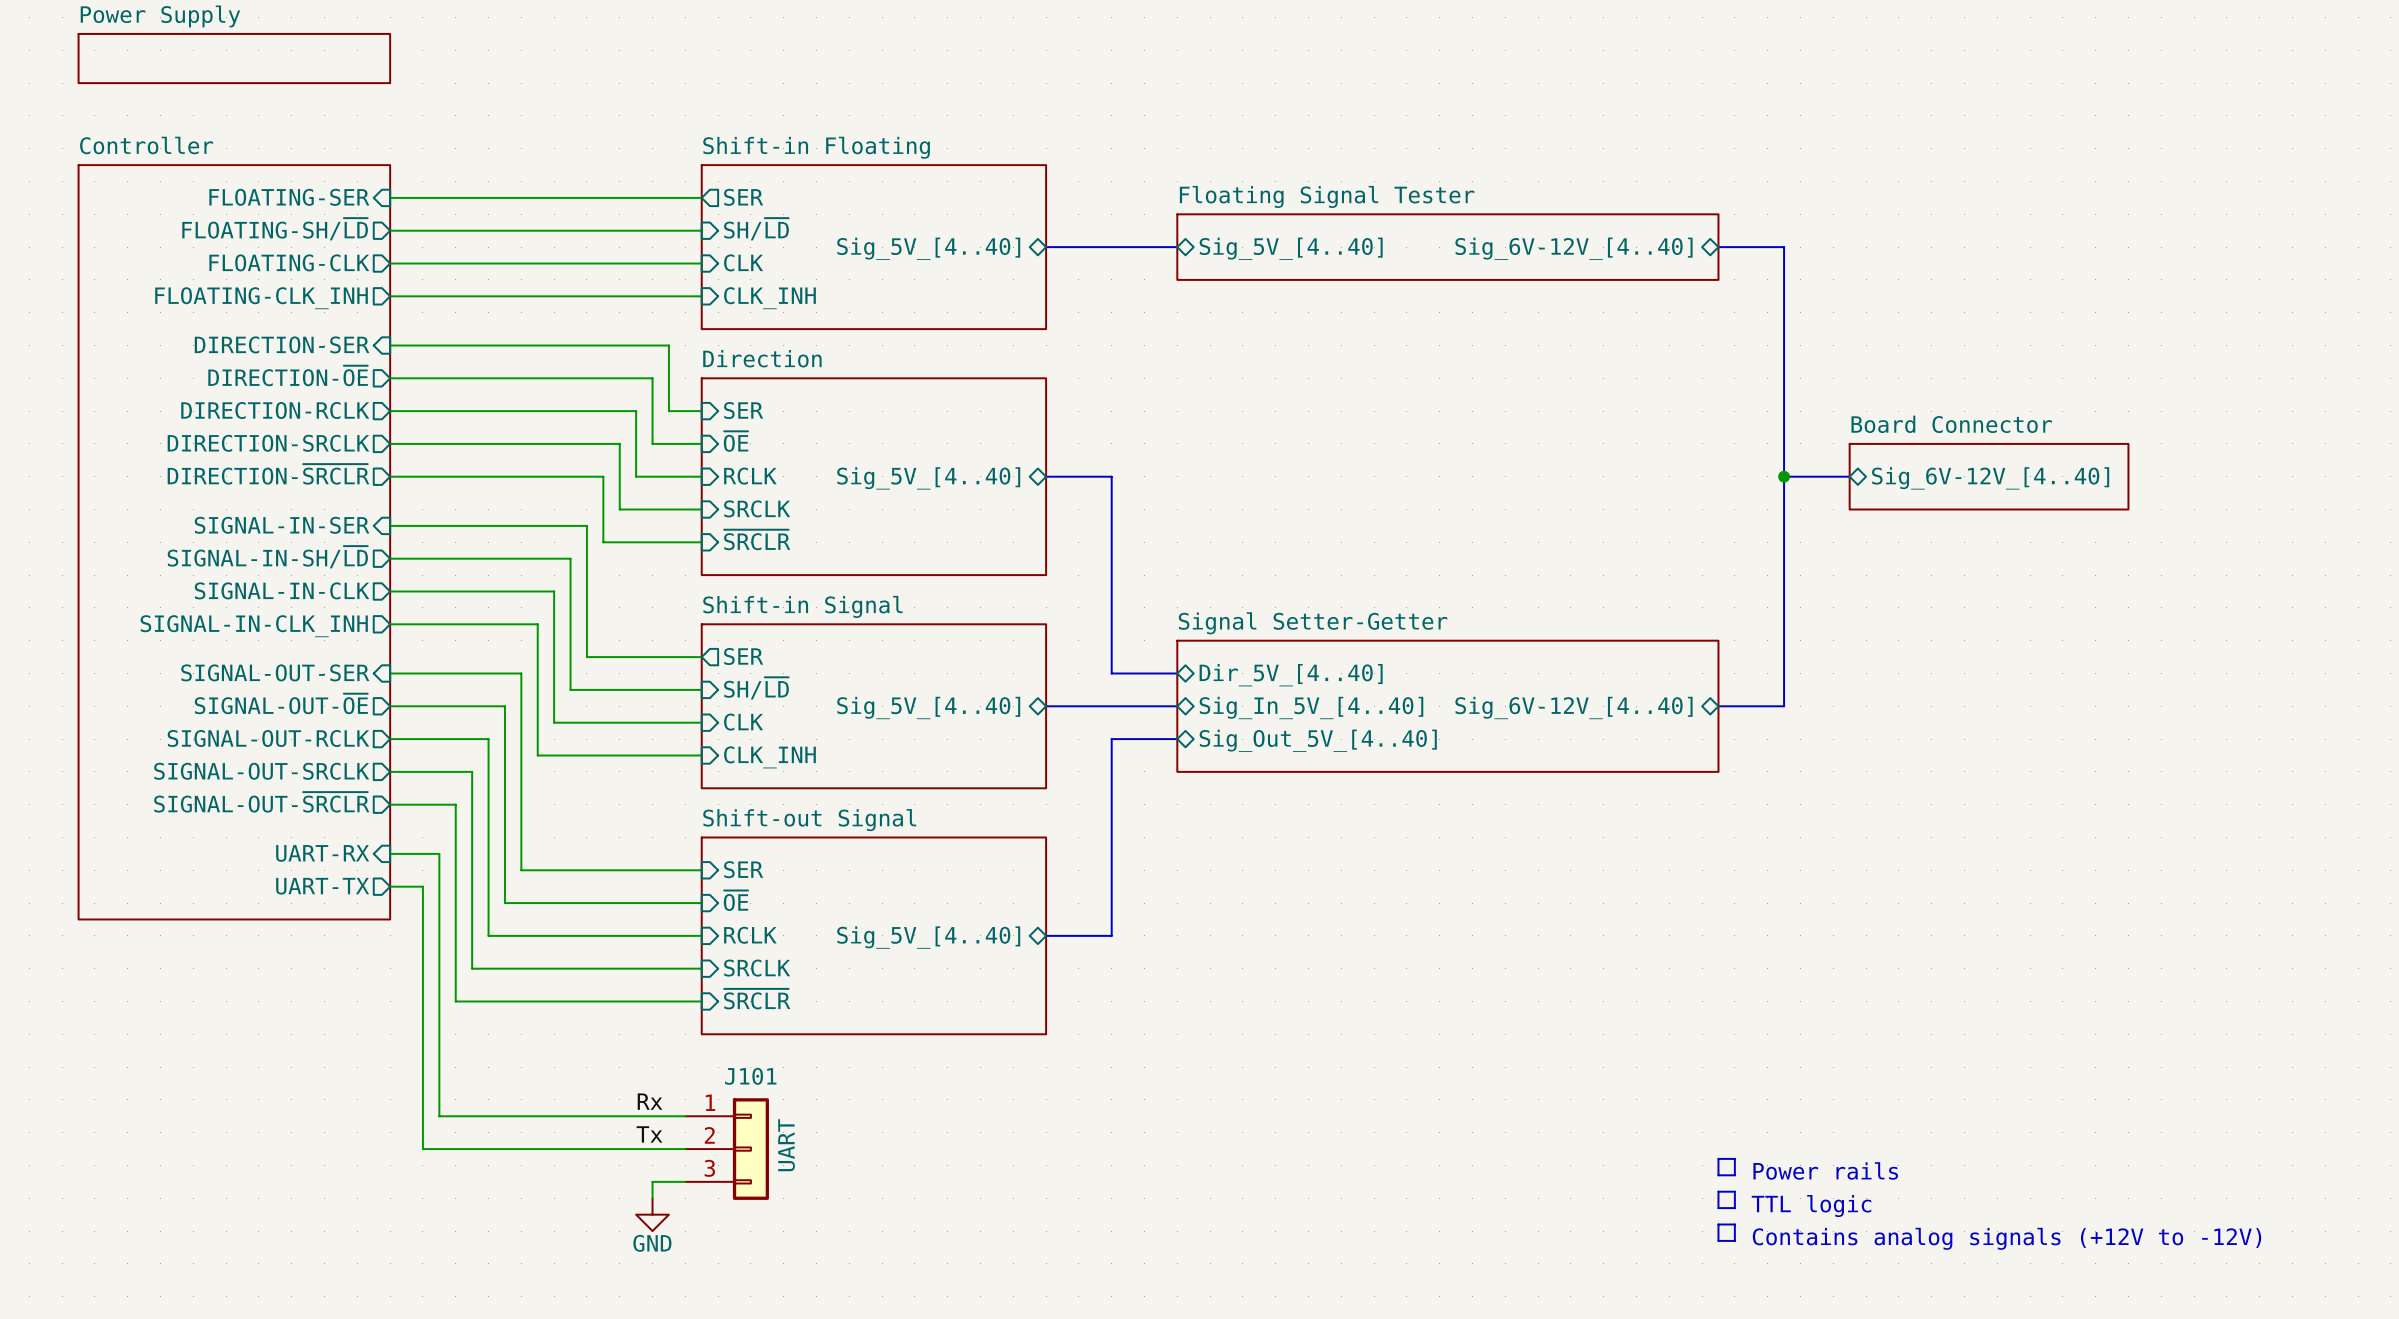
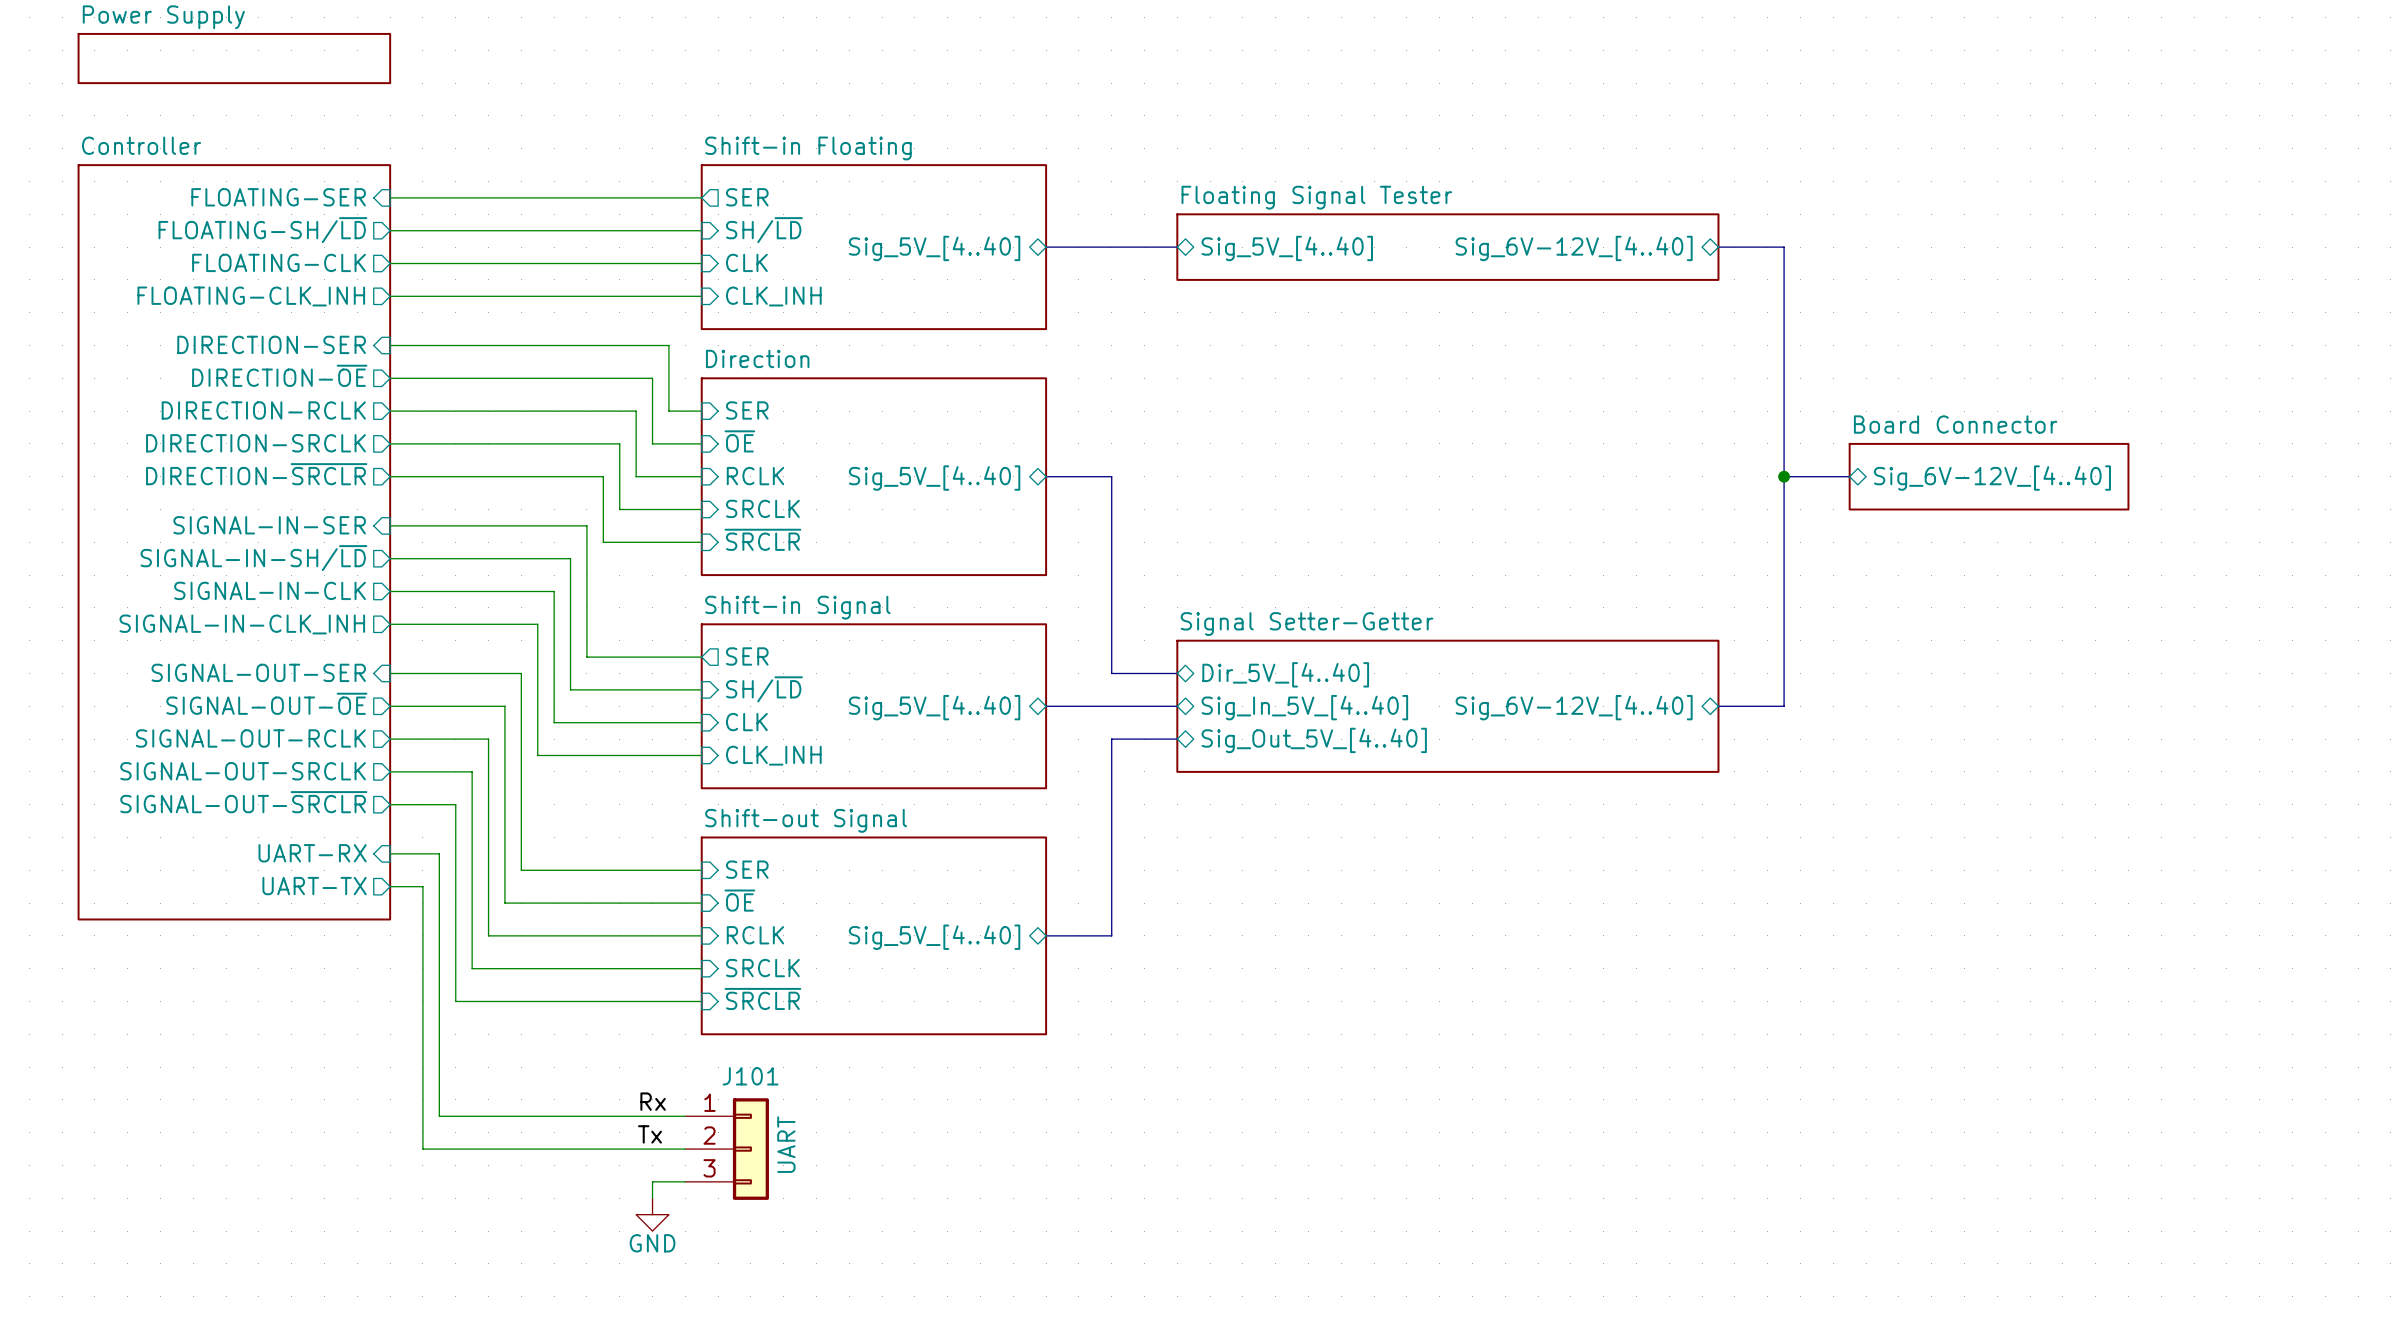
line: (1718, 1158) (1734, 1158) (1734, 1175) (1718, 1175) (1718, 1158) -> none
text: Power rails (1825, 1170) -> none
line: (1718, 1191) (1718, 1208) (1734, 1208) (1734, 1191) (1718, 1191) -> none
text: TTL logic (1811, 1206) -> none
line: (1718, 1224) (1718, 1240) (1734, 1240) (1734, 1224) (1718, 1224) -> none
text: Contains analog signals (+12V to -12V) (2006, 1238) -> none

